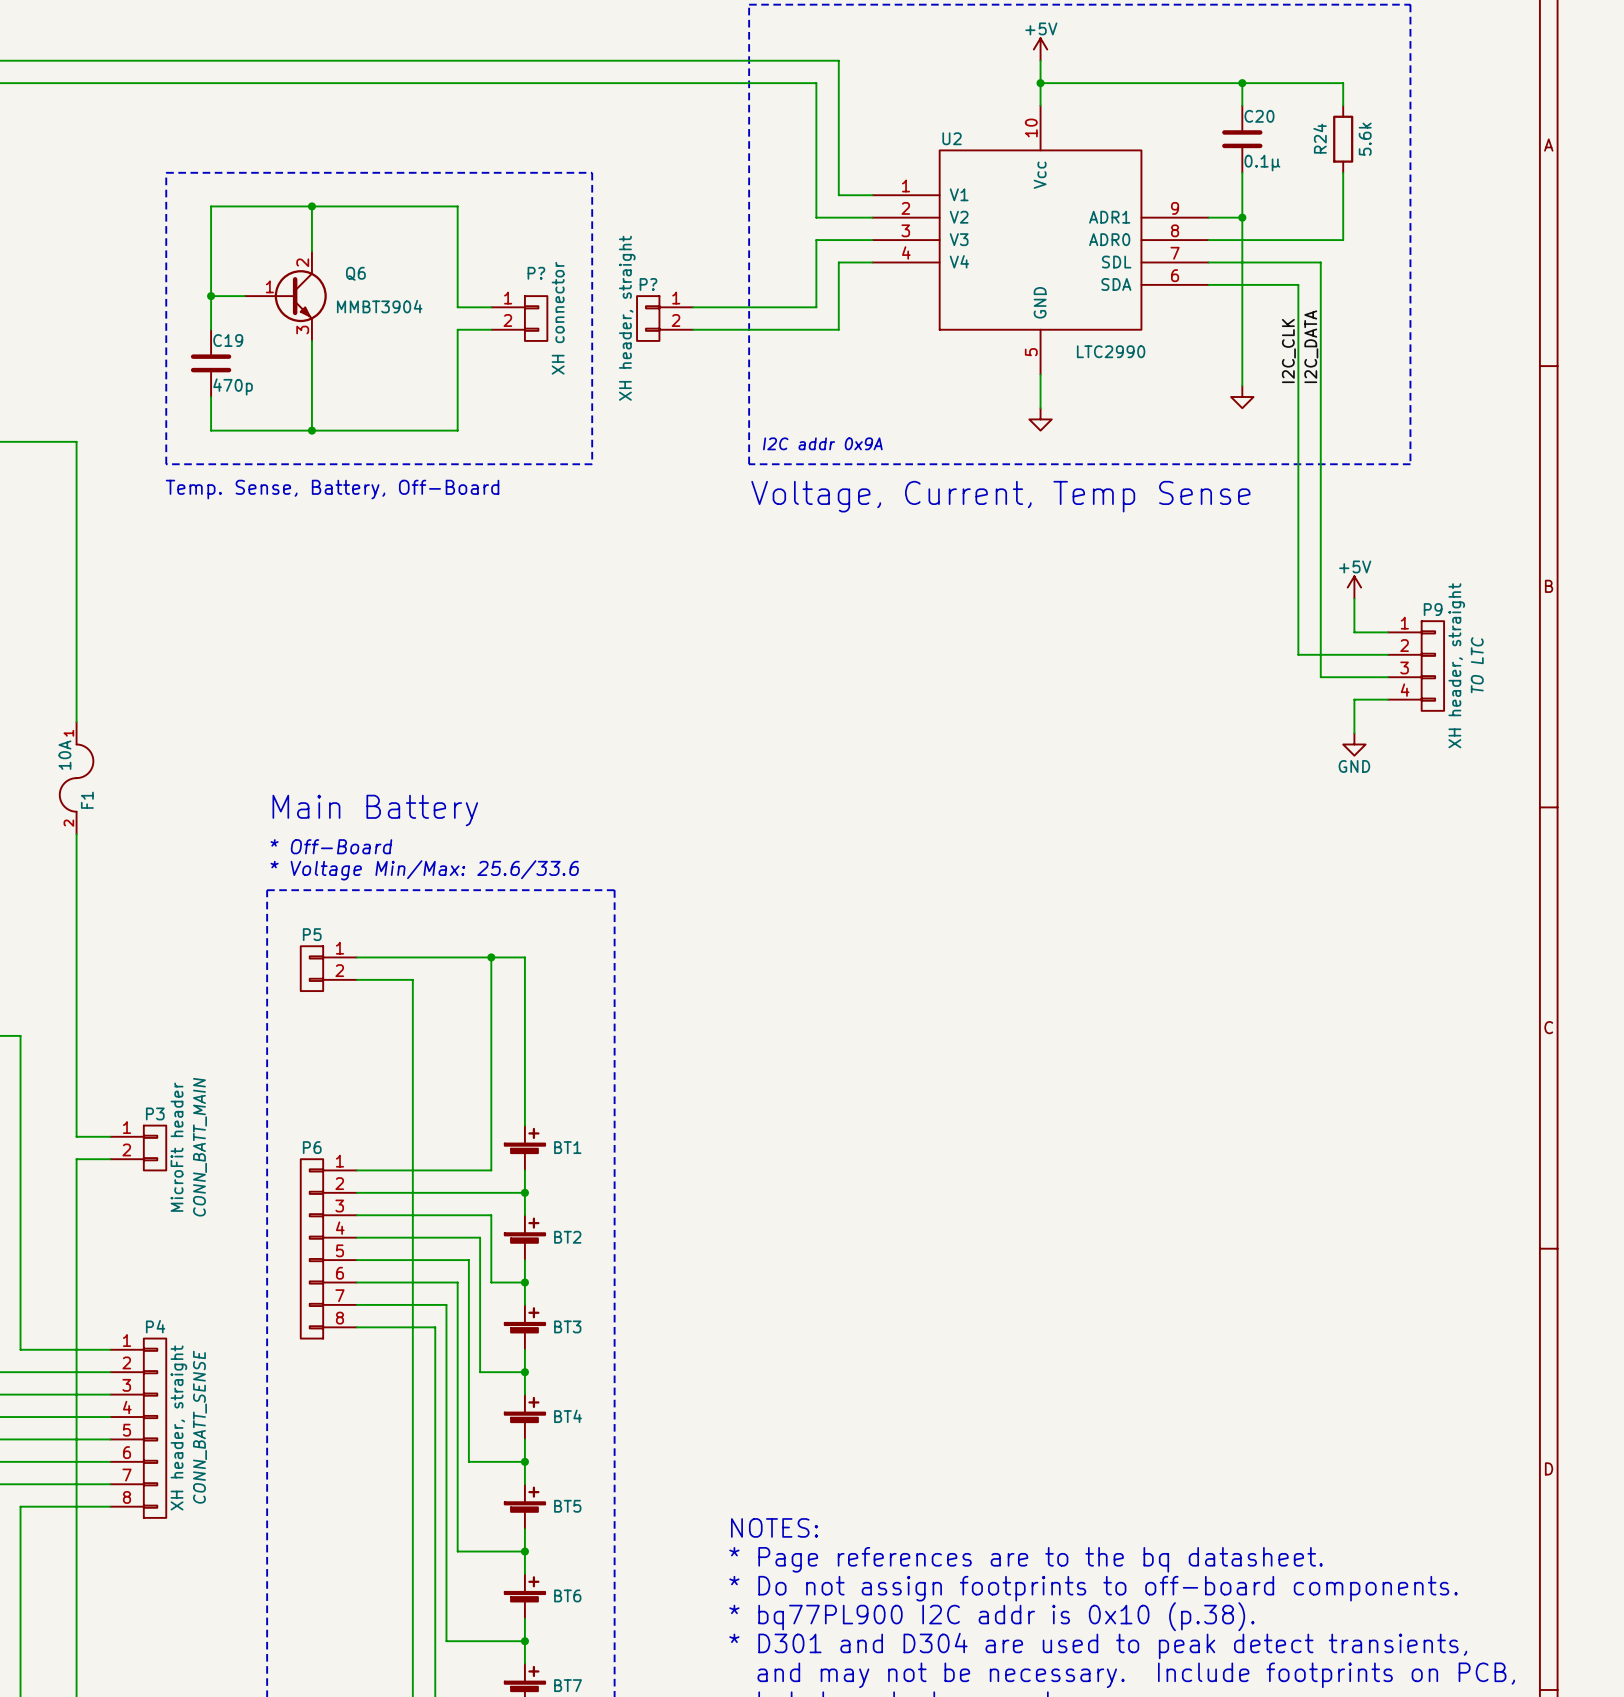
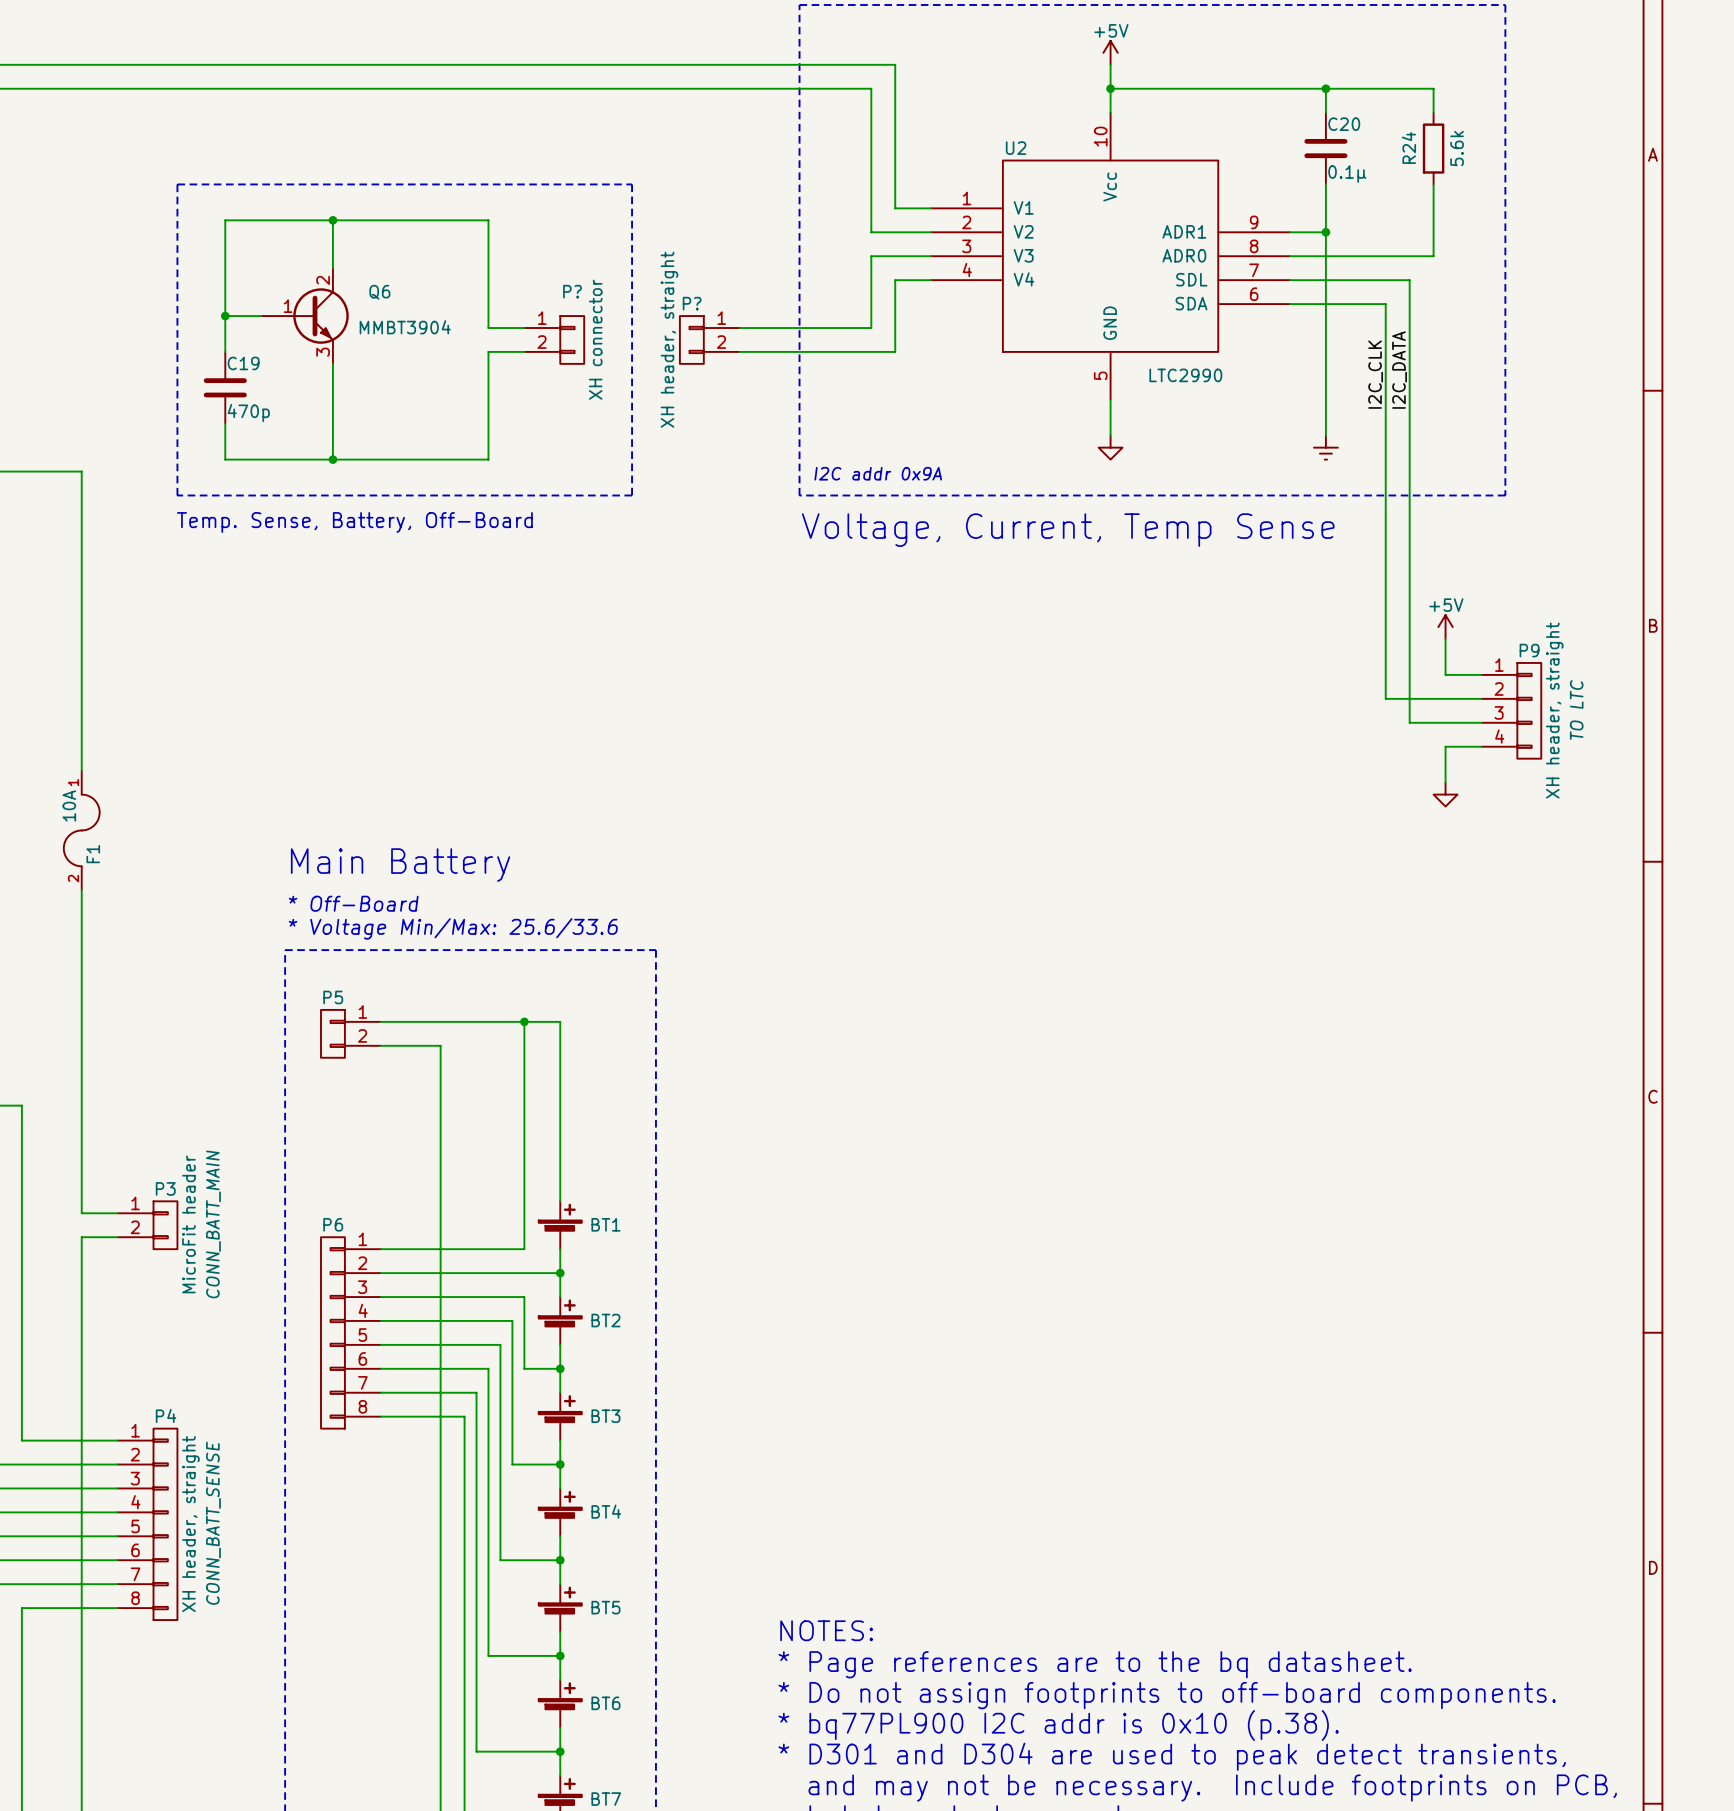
power symbol: (1242, 396) -> none
power symbol: none -> (1325, 447)
power symbol text: GND (1354, 766) -> none

